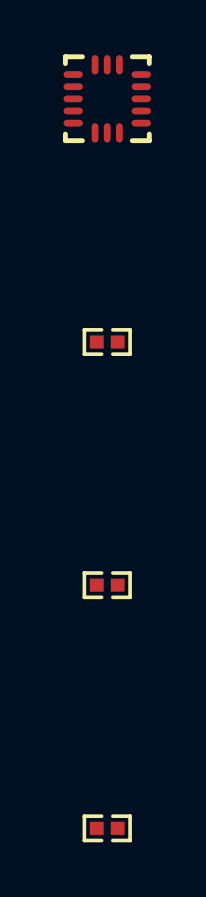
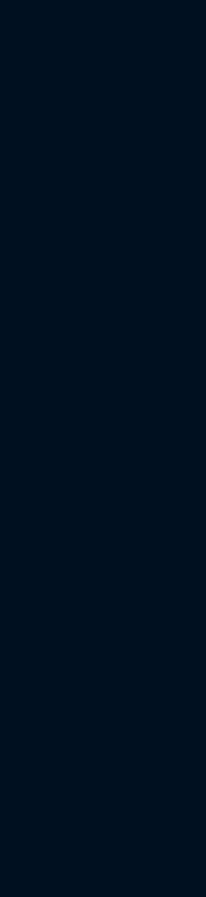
part: (103, 98) -> none
part: (107, 342) -> none
part: (107, 585) -> none
part: (107, 828) -> none

